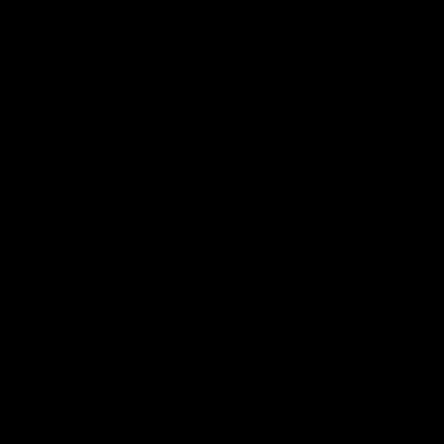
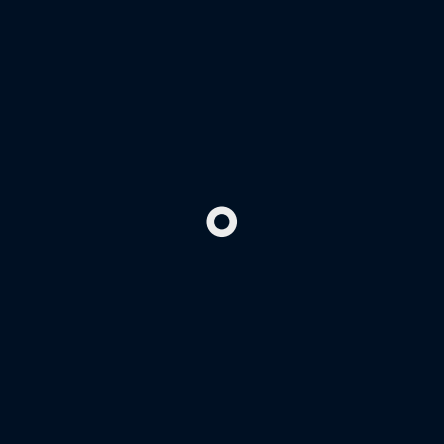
via: none -> (221, 221)

